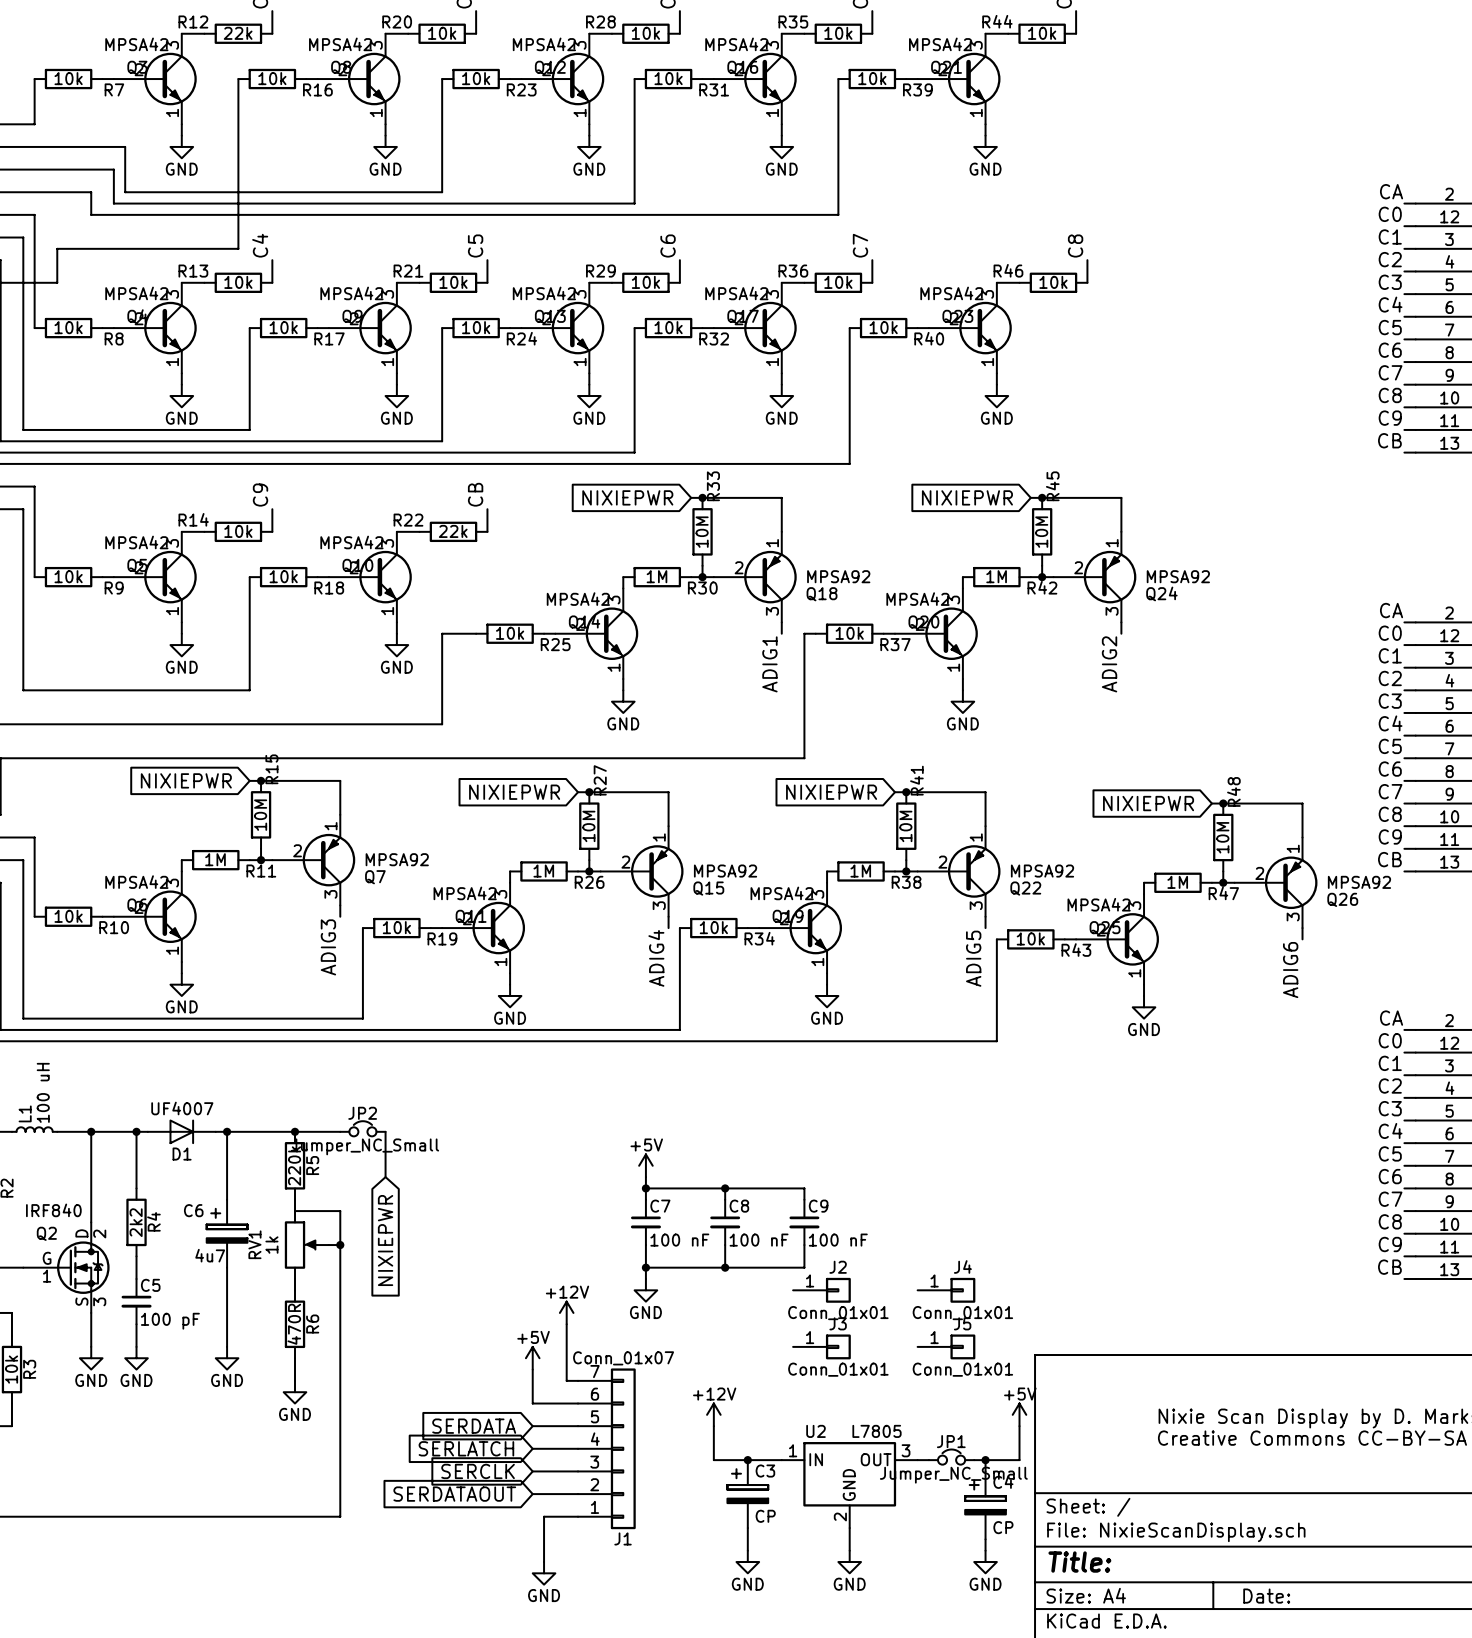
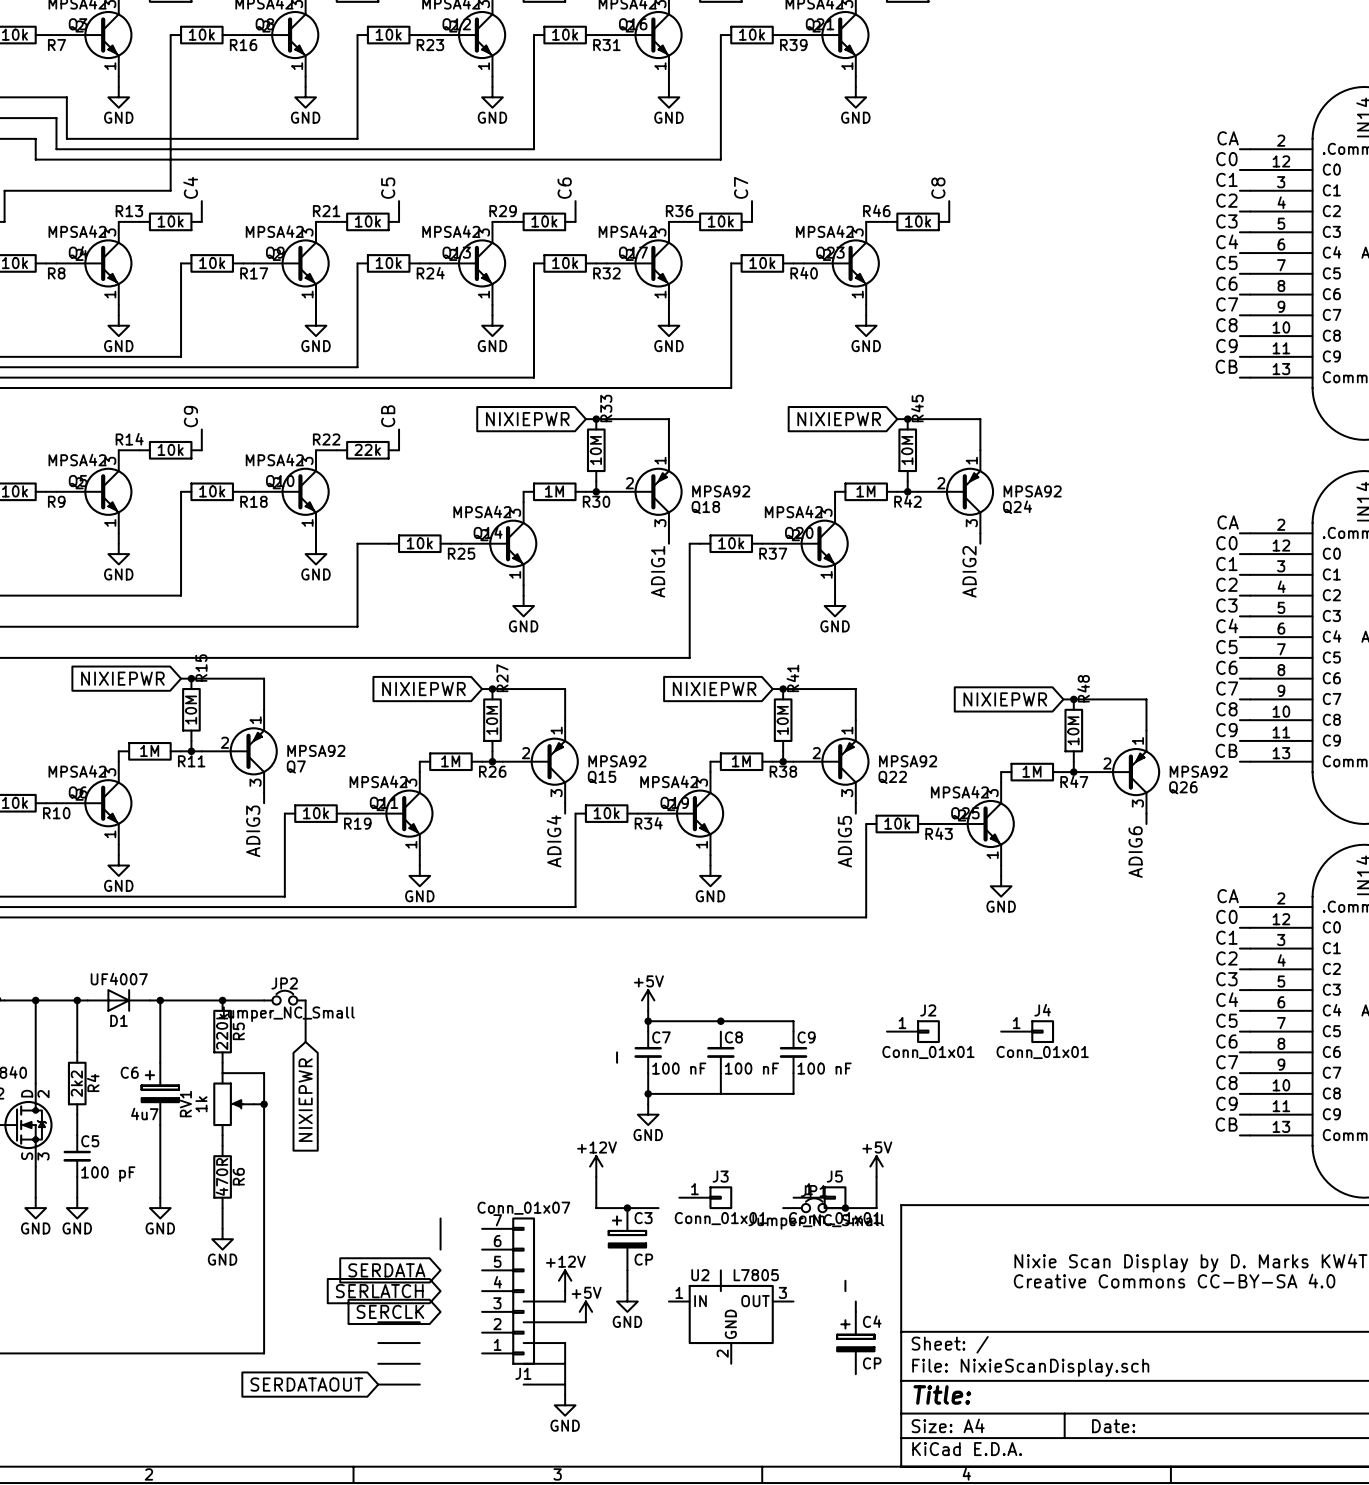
junction: none -> (648, 1021)
junction: none -> (720, 1021)
power symbol position: +5V (645, 1165) -> +5V (648, 1000)
wire: (645, 1177) (645, 1199) -> (648, 1010) (648, 1031)
wire: (645, 1188) (804, 1188) (804, 1199) -> (648, 1021) (793, 1021) (793, 1031)
junction: (645, 1188) -> none
junction: (725, 1188) -> none
C7 position: (645, 1222) -> (648, 1052)
C8 position: (725, 1222) -> (720, 1052)
C9 position: (804, 1222) -> (793, 1052)
junction: none -> (648, 1093)
wire: (645, 1245) (645, 1278) -> (648, 1073) (648, 1104)
wire: (725, 1245) (725, 1267) -> (720, 1073) (720, 1093)
wire: (804, 1245) (804, 1267) (645, 1267) -> (793, 1073) (793, 1093) (648, 1093)
power symbol: none -> GND (648, 1114)
junction: (645, 1267) -> none
junction: (725, 1267) -> none
power symbol: GND (645, 1290) -> none
J2 position: (821, 1290) -> (913, 1031)
J4 position: (946, 1290) -> (1027, 1031)
power symbol: +12V (566, 1312) -> none
power symbol: none -> +12V (596, 1166)
wire: (566, 1324) (566, 1380) (578, 1380) -> none
power symbol: +5V (532, 1358) -> none
junction: none -> (627, 1208)
junction: none -> (845, 1208)
wire: (532, 1403) (578, 1403) -> (523, 1363) (565, 1363)
power symbol position: +12V (713, 1414) -> +12V (565, 1280)
power symbol position: +5V (1019, 1414) -> +5V (876, 1166)
wire: (532, 1426) (578, 1426) -> (378, 1322) (419, 1322)
wire: (713, 1426) (713, 1460) (781, 1460) -> (596, 1176) (596, 1208) (658, 1208)
wire: (1019, 1426) (1019, 1460) (974, 1460) -> (876, 1176) (876, 1208) (835, 1208)
wire: (532, 1448) (578, 1448) -> (378, 1343) (419, 1343)
wire: none -> (565, 1291) (565, 1301) (523, 1301)
JP1 position: (951, 1457) -> (814, 1205)
power symbol: none -> GND (627, 1301)
junction: (747, 1460) -> none
wire: (917, 1460) (928, 1460) -> (783, 1208) (793, 1208)
junction: (985, 1460) -> none
wire: (532, 1471) (578, 1471) -> (378, 1363) (419, 1363)
power symbol: none -> +5V (585, 1311)
wire: none -> (523, 1322) (585, 1322)
global label position: SERDATAOUT (454, 1494) -> SERDATAOUT (306, 1384)
wire: (532, 1494) (578, 1494) -> (378, 1384) (419, 1384)
C3 position: (747, 1494) -> (627, 1239)
wire: none -> (523, 1343) (565, 1343) (565, 1394)
wire: (578, 1516) (544, 1516) (544, 1562) -> none
wire: (747, 1528) (747, 1550) -> (627, 1270) (627, 1291)
wire: (849, 1528) (849, 1550) -> (720, 1270) (720, 1291)
wire: (985, 1539) (985, 1550) -> (845, 1280) (845, 1291)
wire: none -> (523, 1384) (565, 1384)
power symbol: GND (747, 1562) -> none
power symbol: GND (849, 1562) -> none
power symbol: GND (985, 1562) -> none
power symbol: GND (544, 1573) -> none
power symbol: none -> GND (565, 1405)

